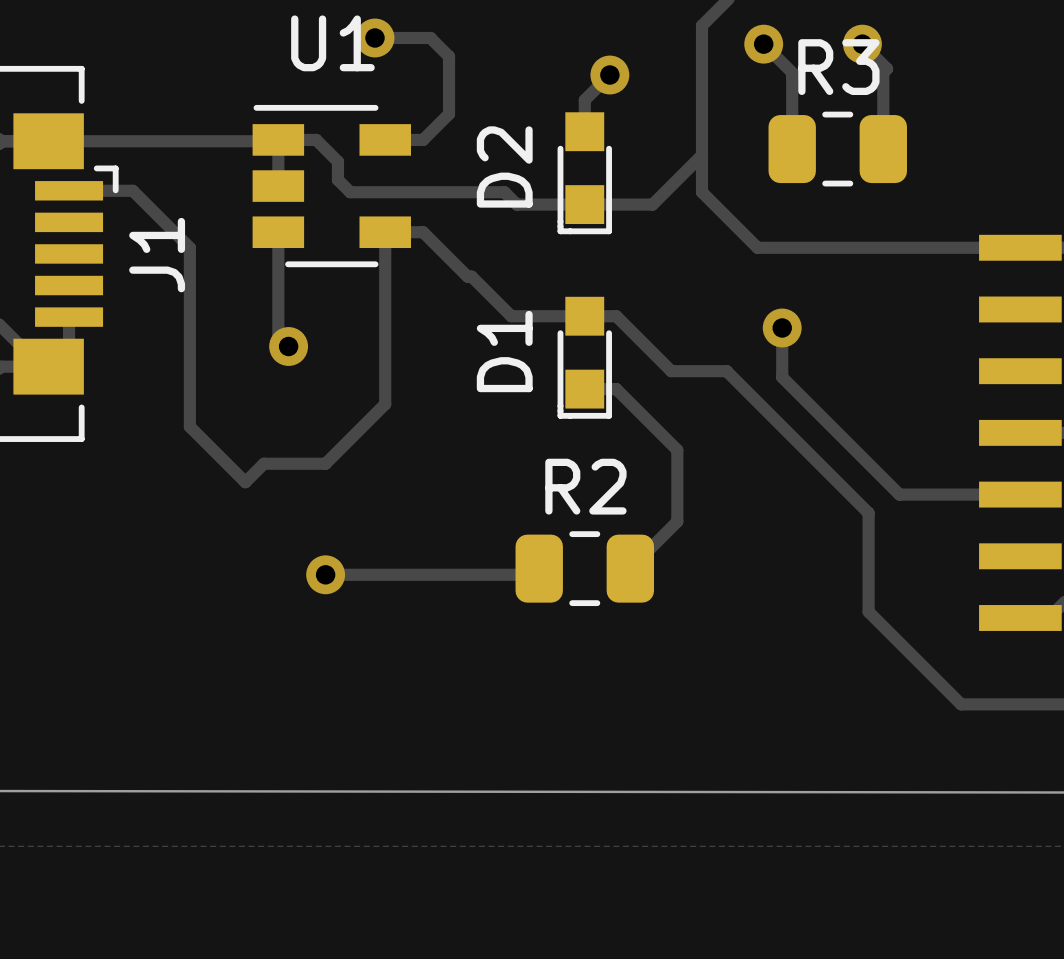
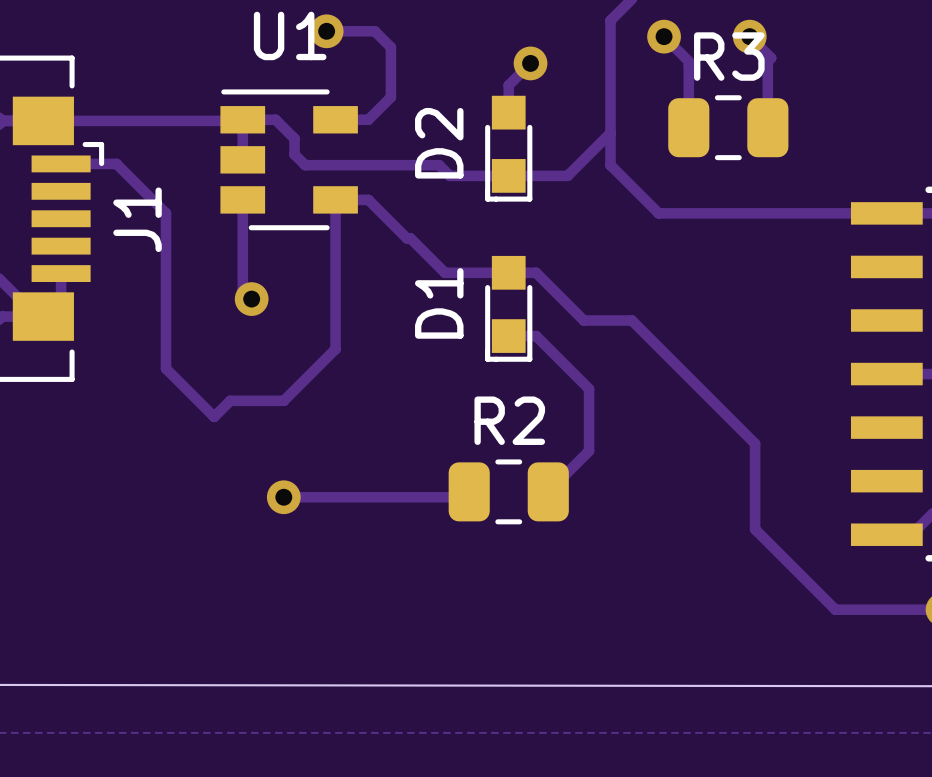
track: (782, 327) (782, 377) (899, 494) (1020, 494) -> none
via: (782, 327) -> none

